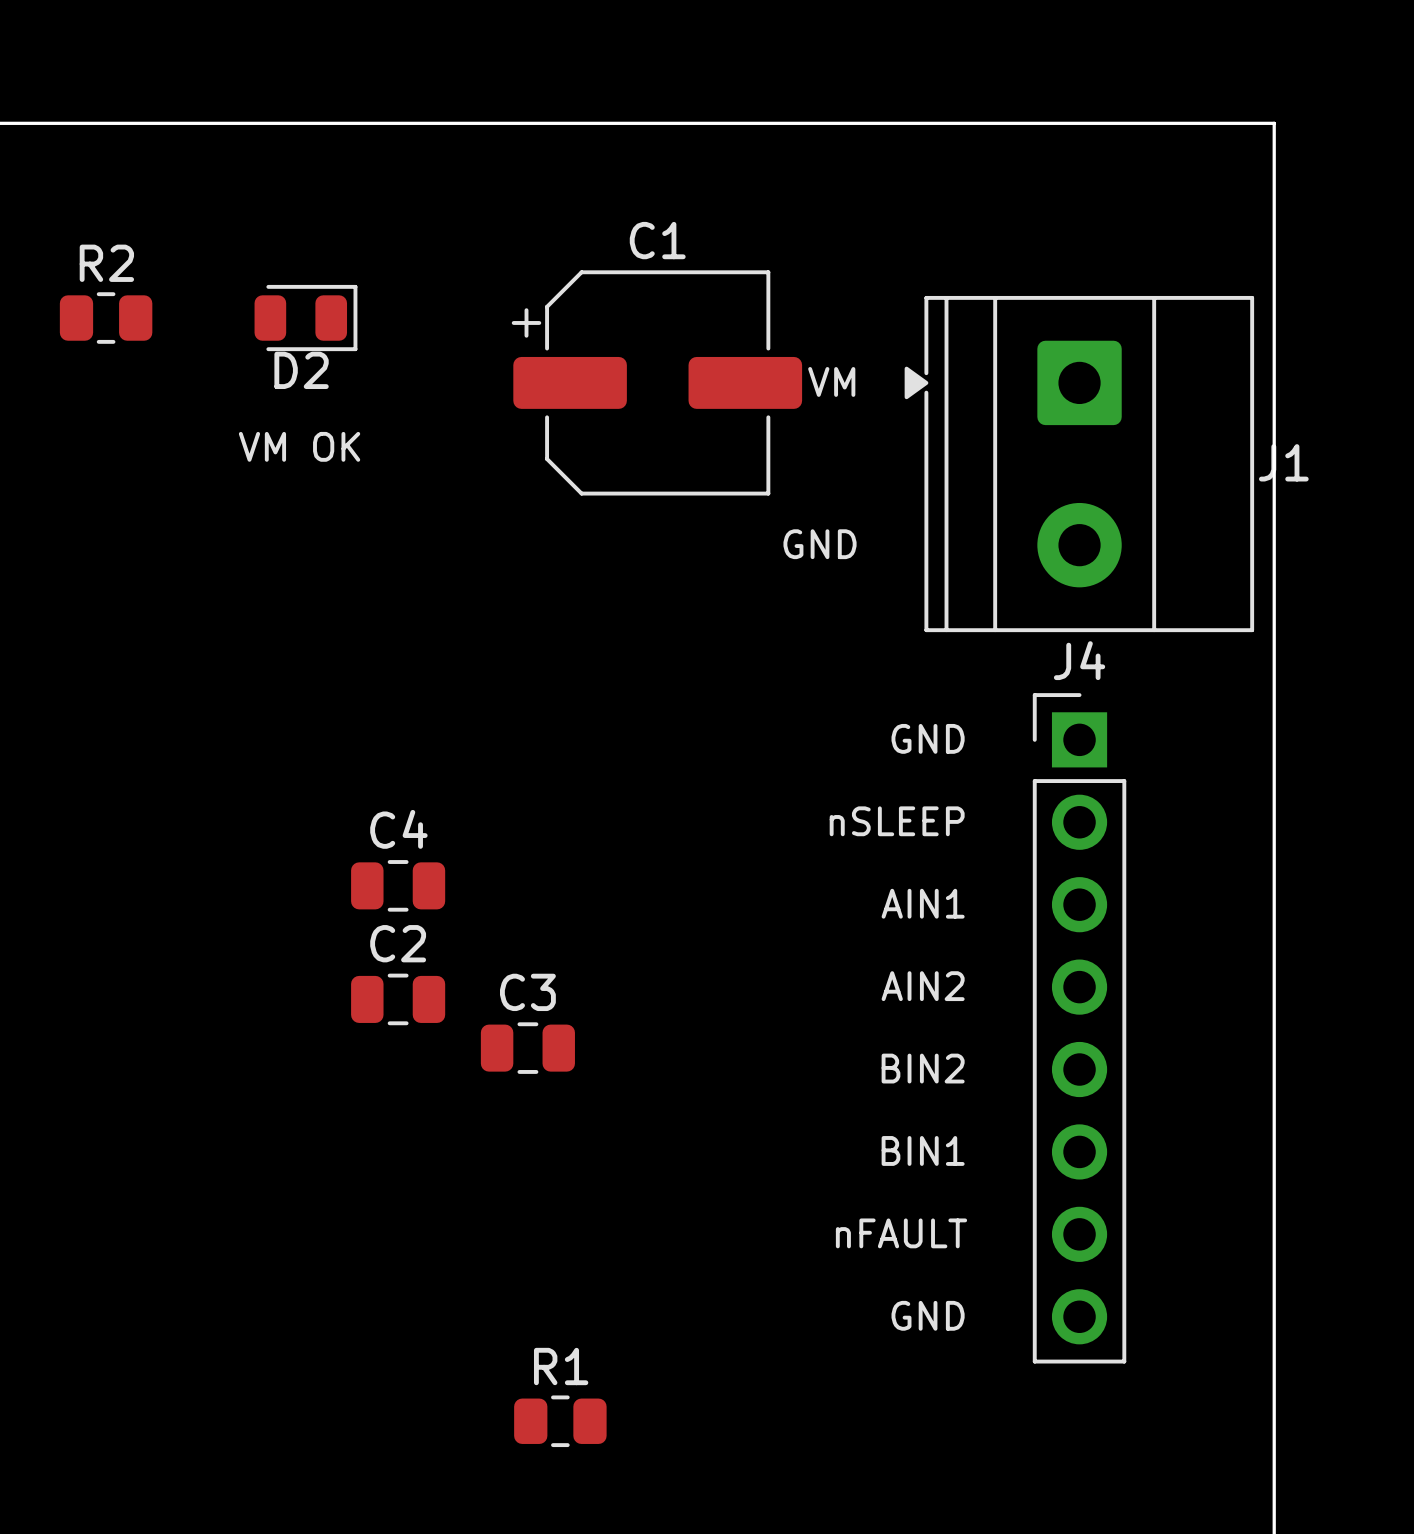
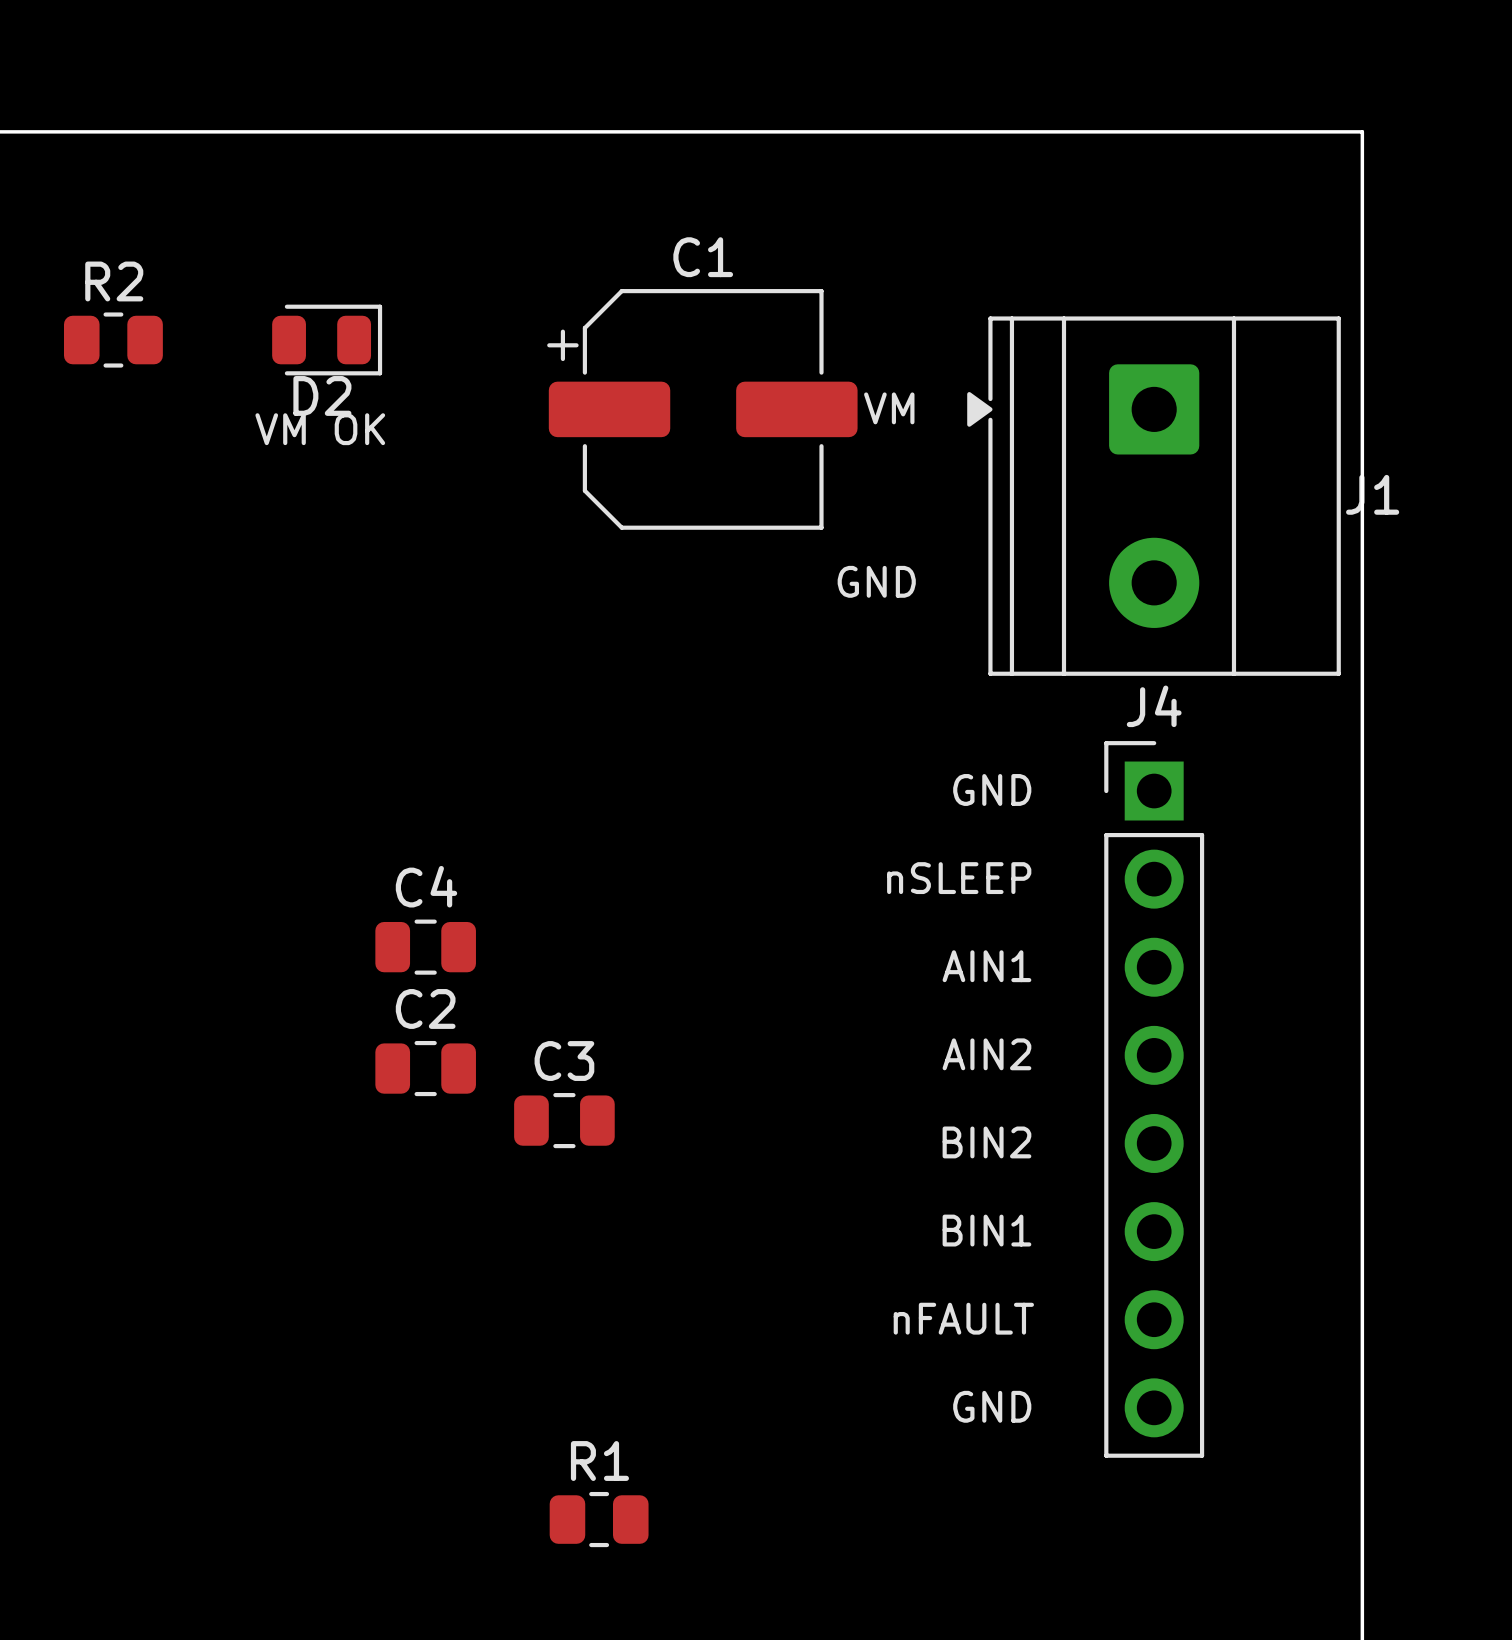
text position: VM OK (299, 446) -> VM OK (320, 429)

